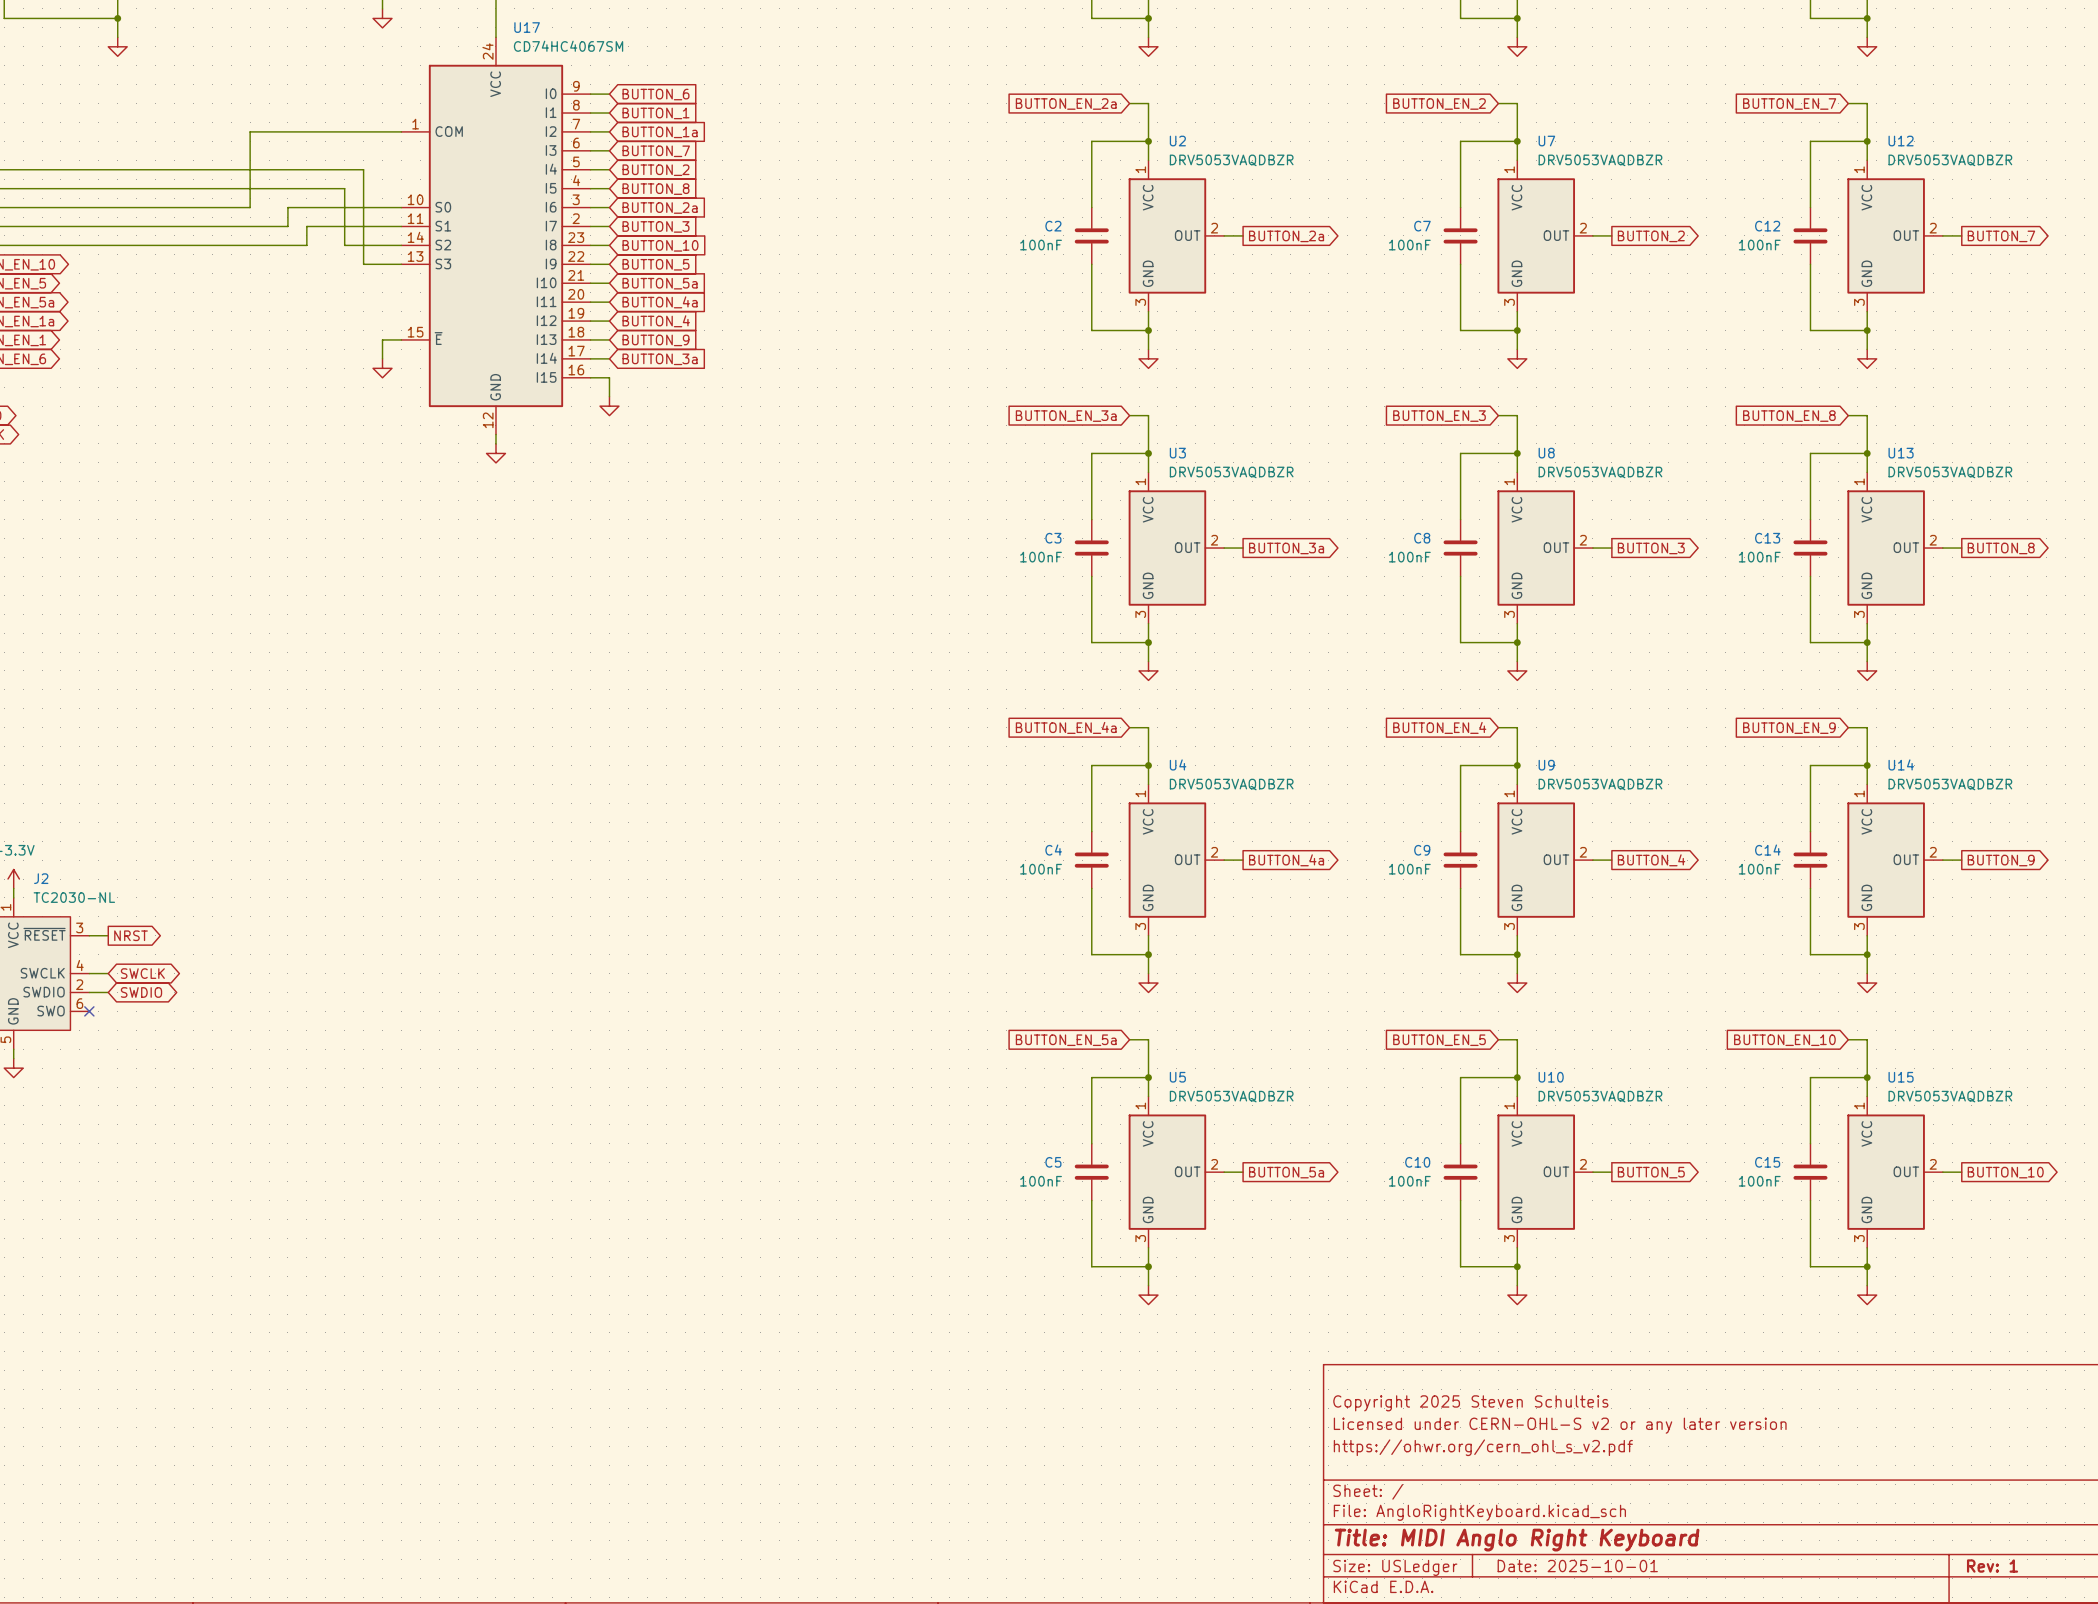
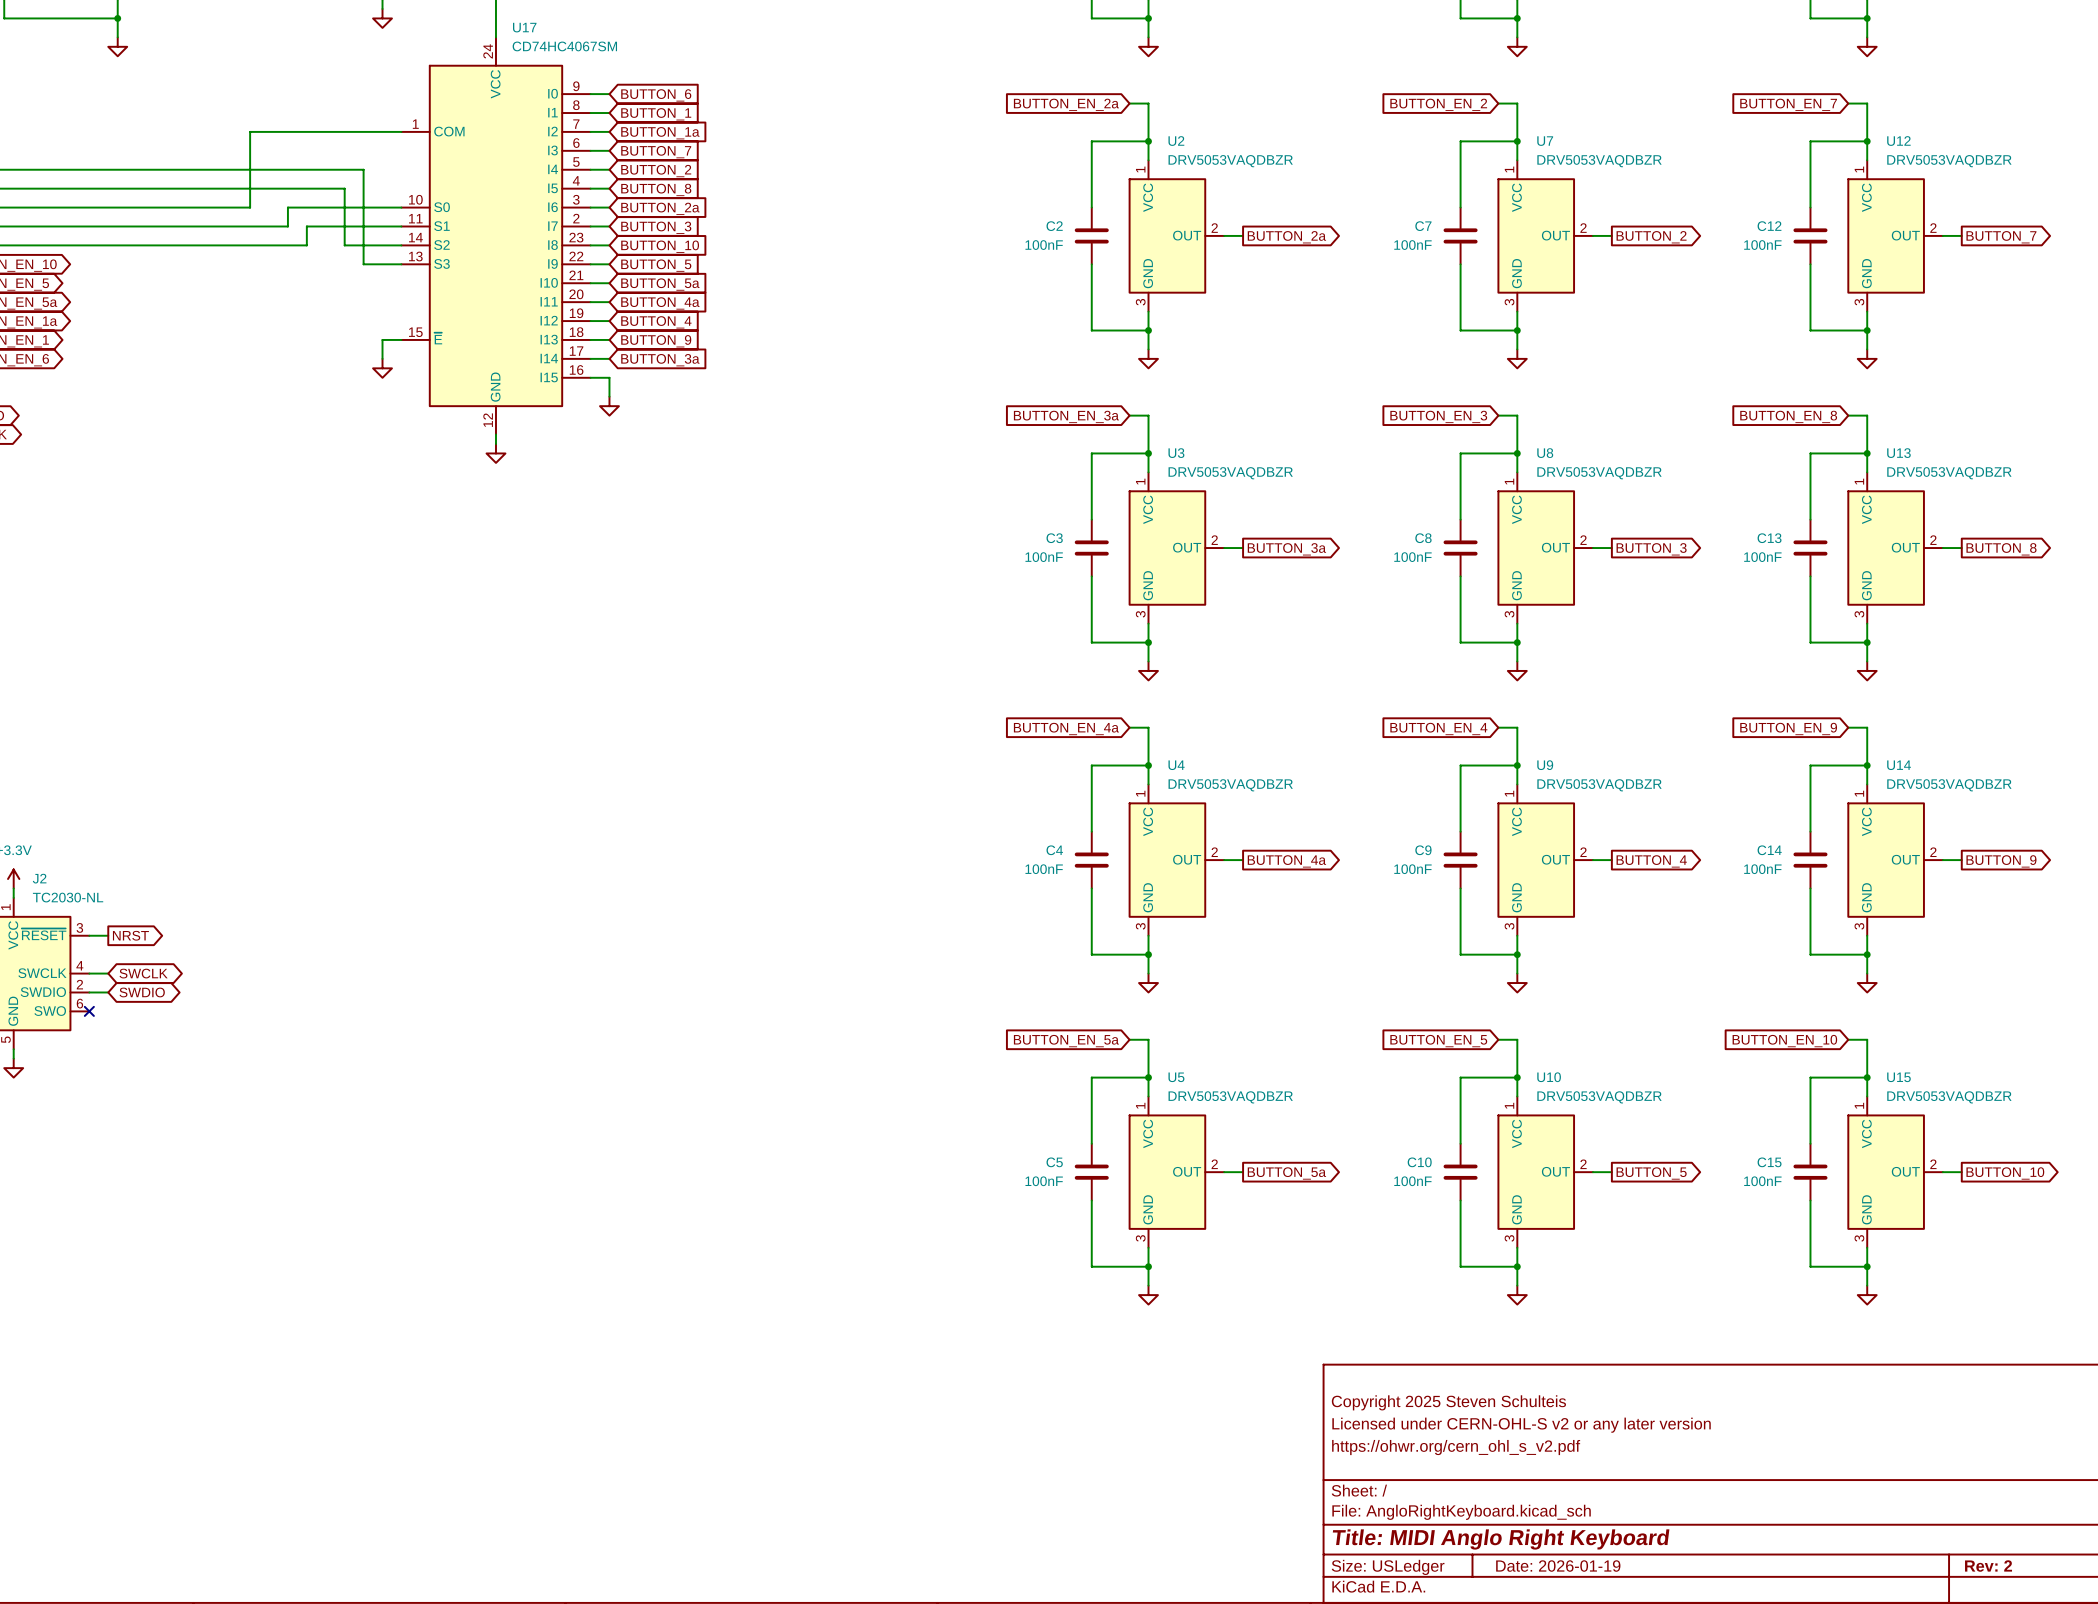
title block: Date: 2025-10-01 (1577, 1566) -> Date: 2026-01-19 (1558, 1566)
title block: Rev: 1 (1992, 1566) -> Rev: 2 (1988, 1566)

